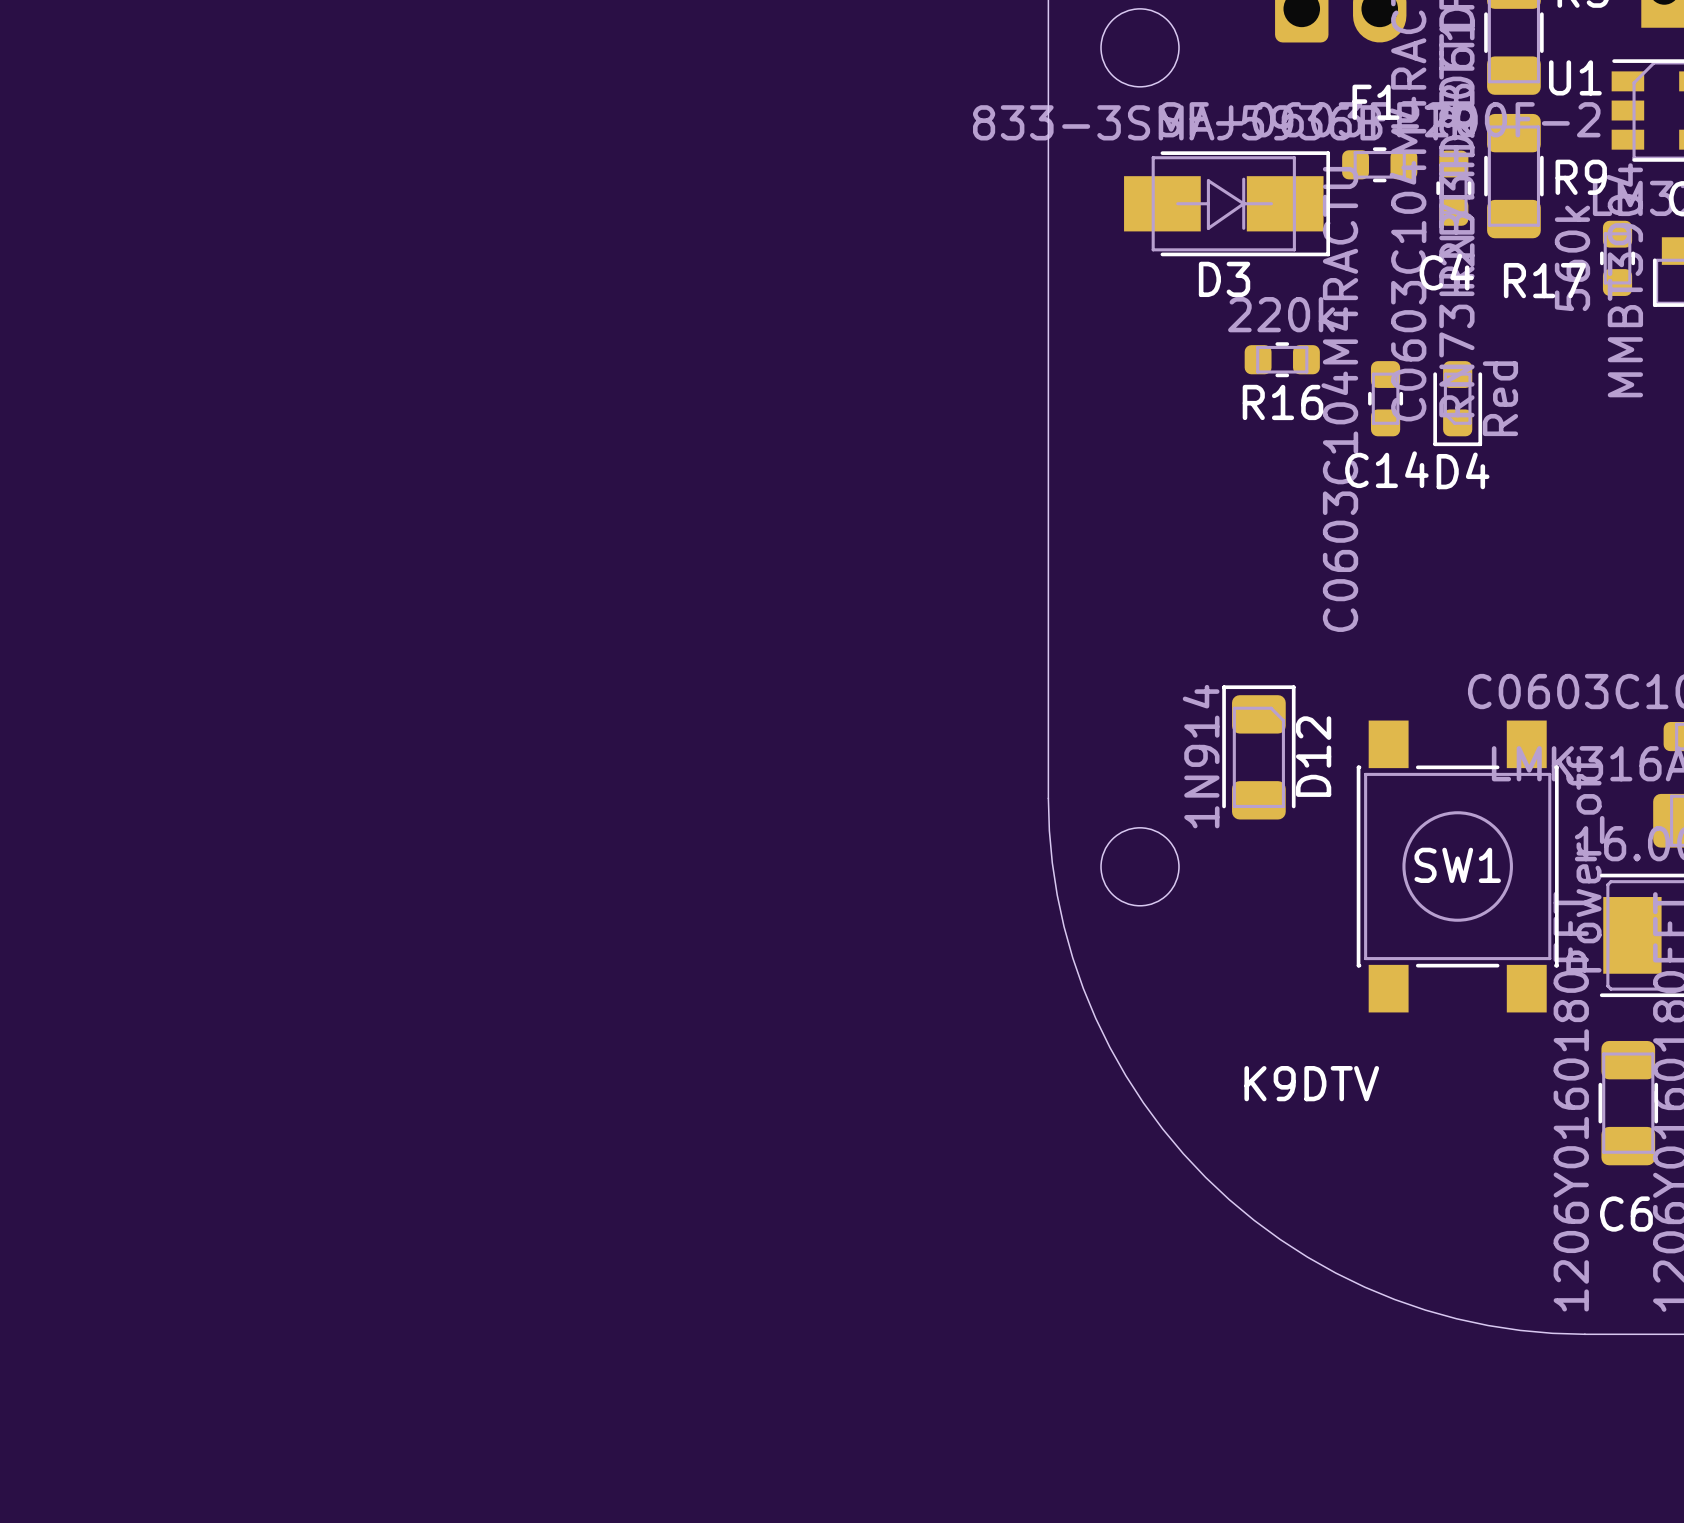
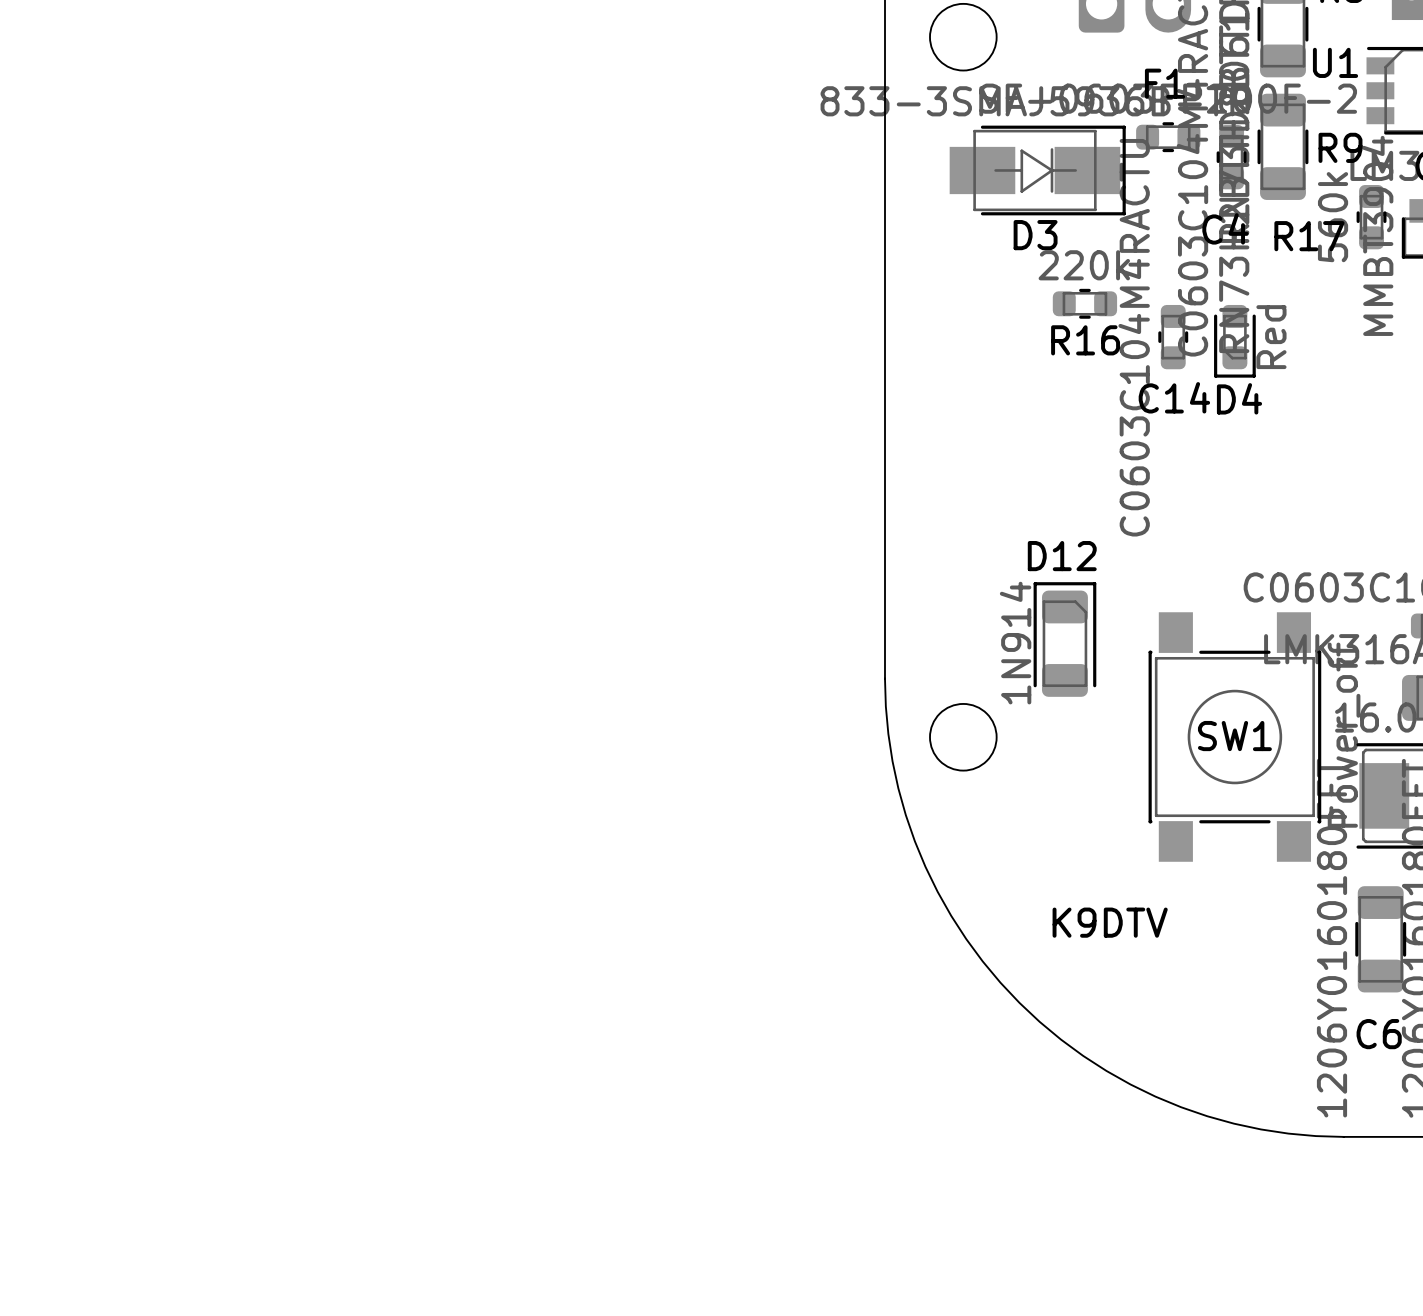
D12 name rotation: 0° (1313, 756) -> 90° clockwise (1062, 556)
D12 name position: D12 (1313, 756) -> D12 (1062, 556)

